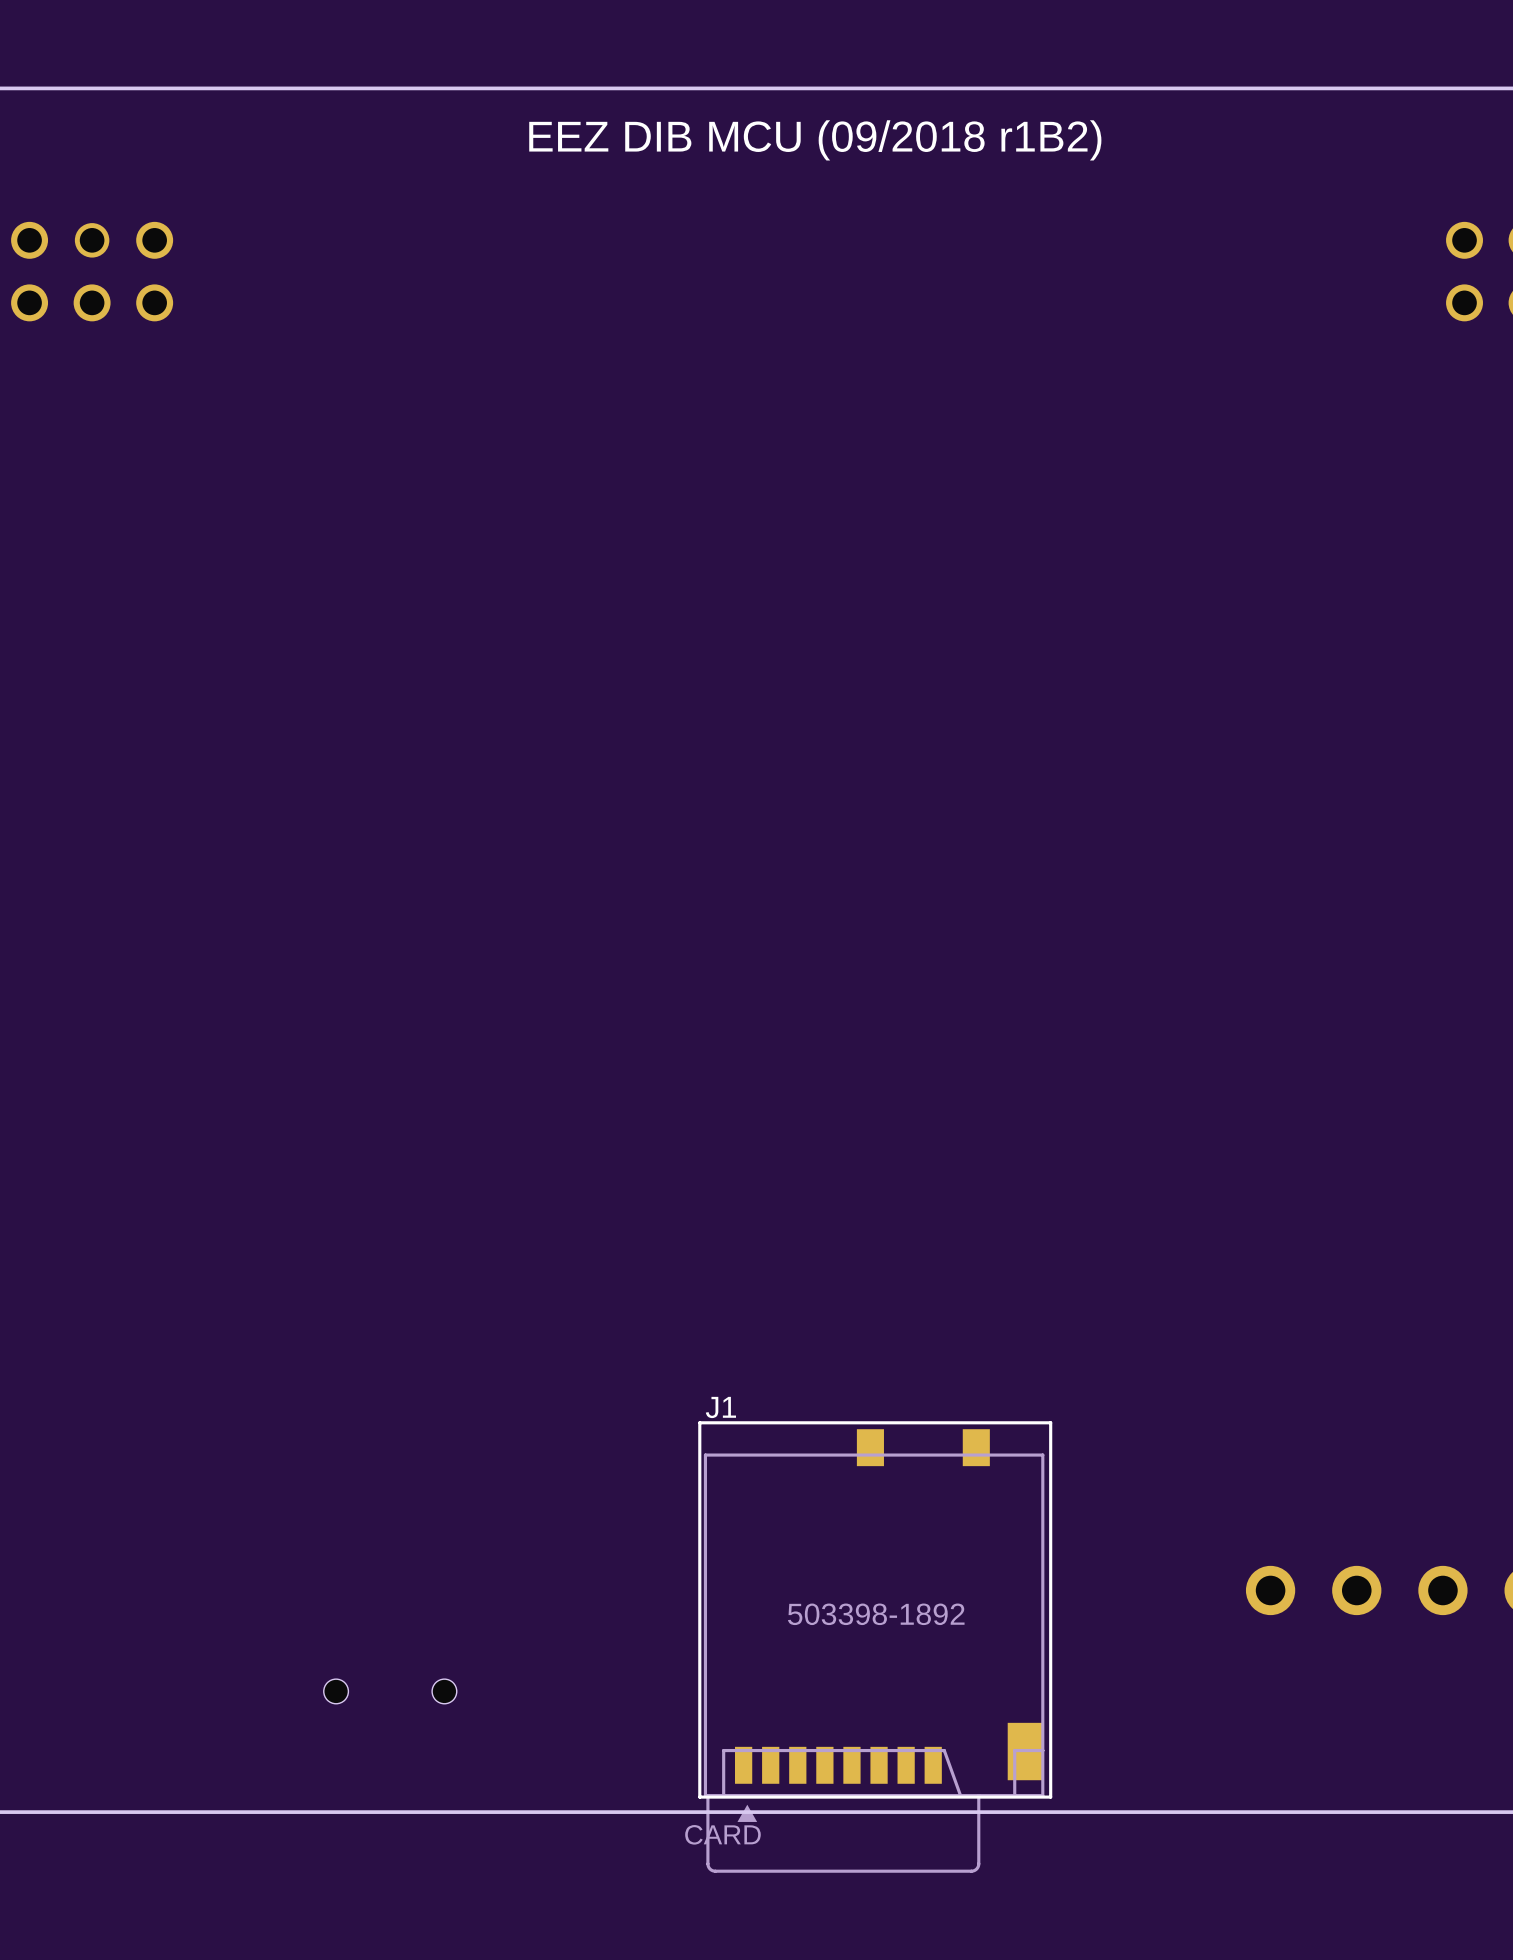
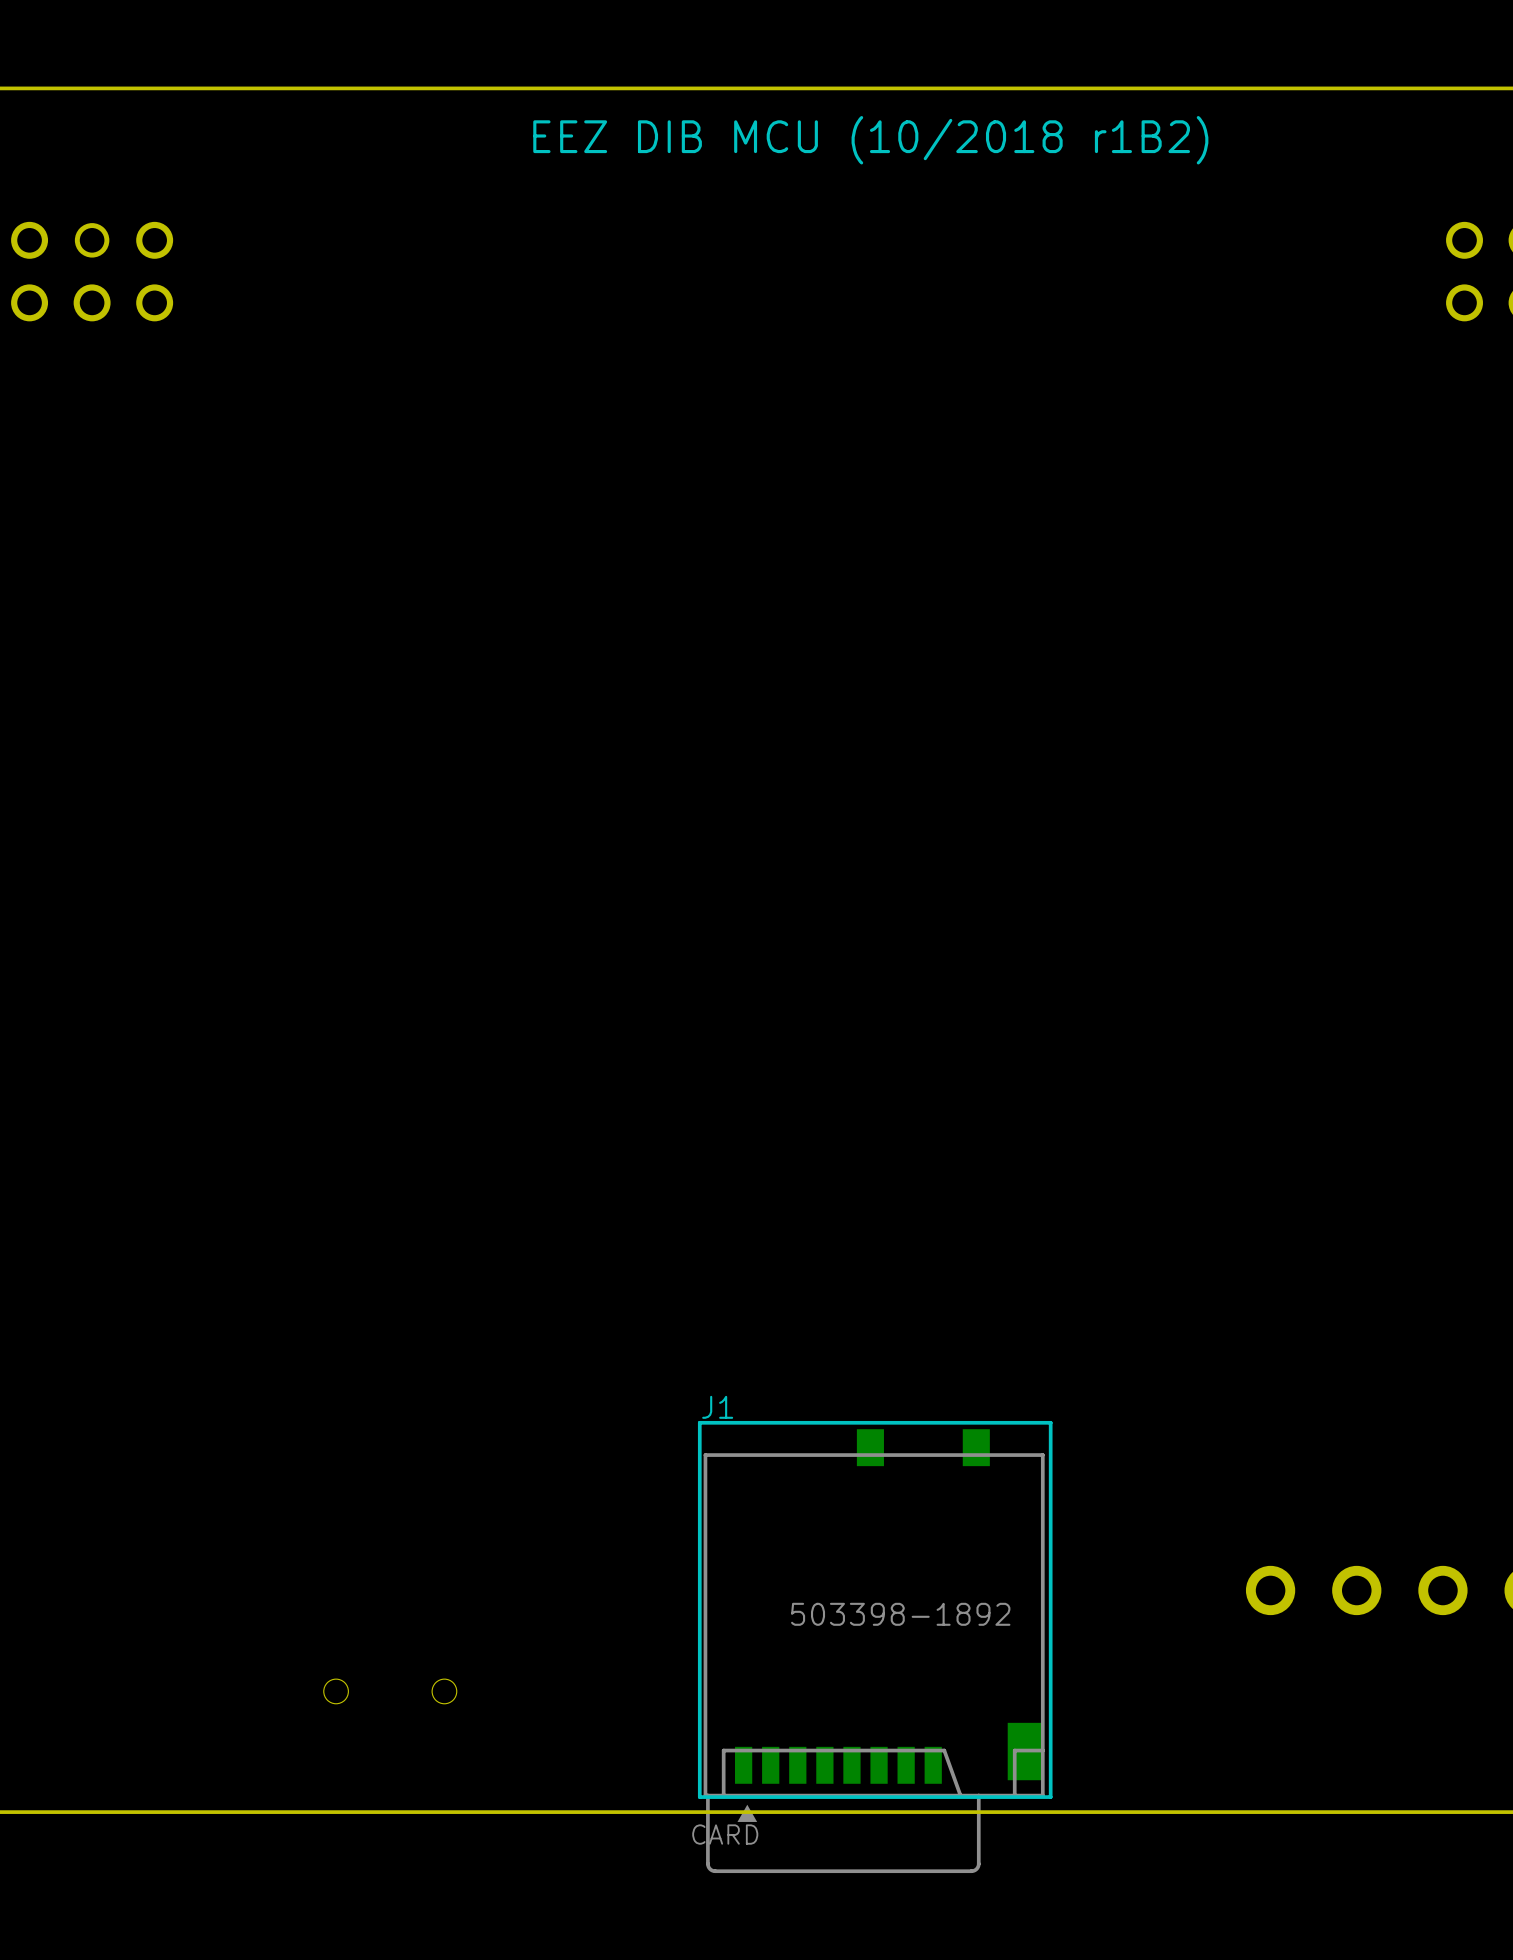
text: EEZ DIB MCU (09/2018 r1B2) (815, 140) -> EEZ DIB MCU (10/2018 r1B2) (870, 140)
J1 footprint: [698, 1421, 1053, 1873] -> [697, 1420, 1053, 1874]

